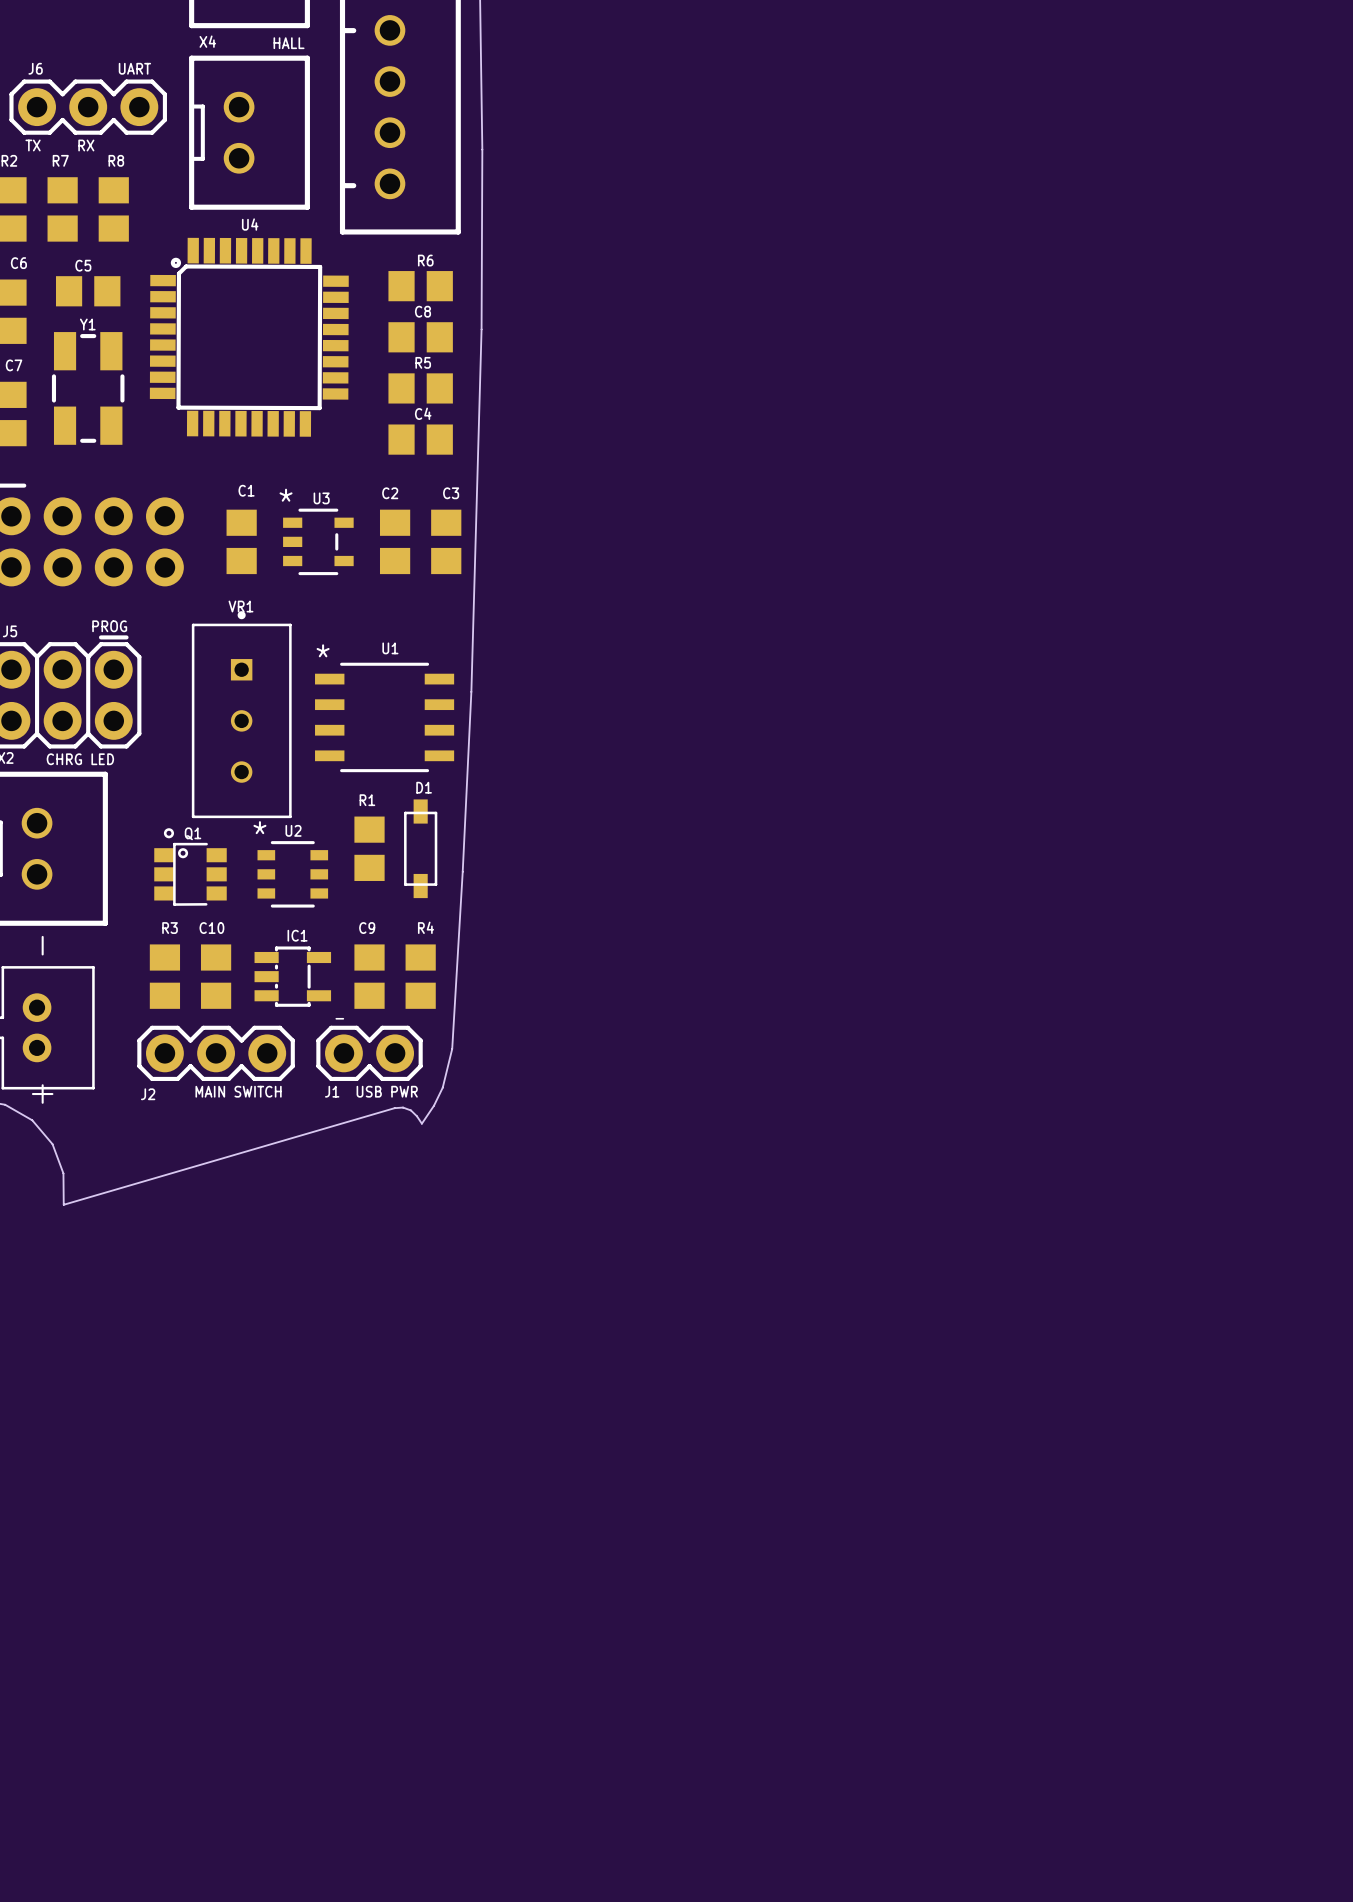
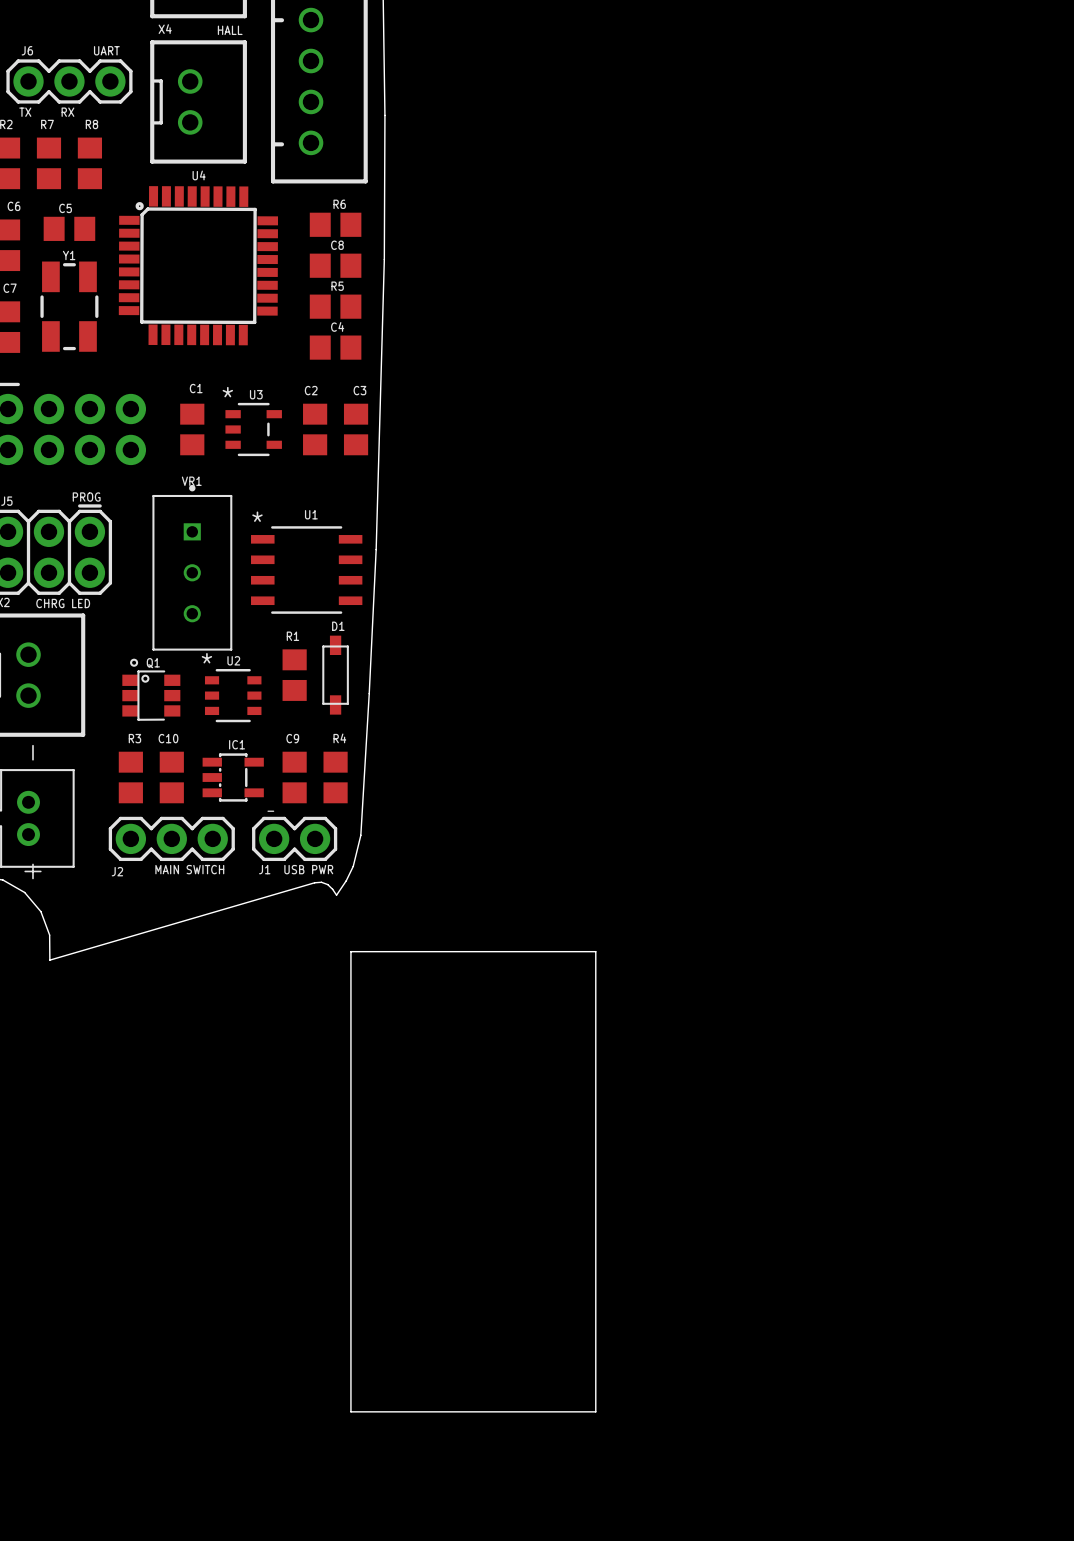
board edge: none -> (350, 951) (595, 951) (595, 1411) (350, 1411) (350, 951)

